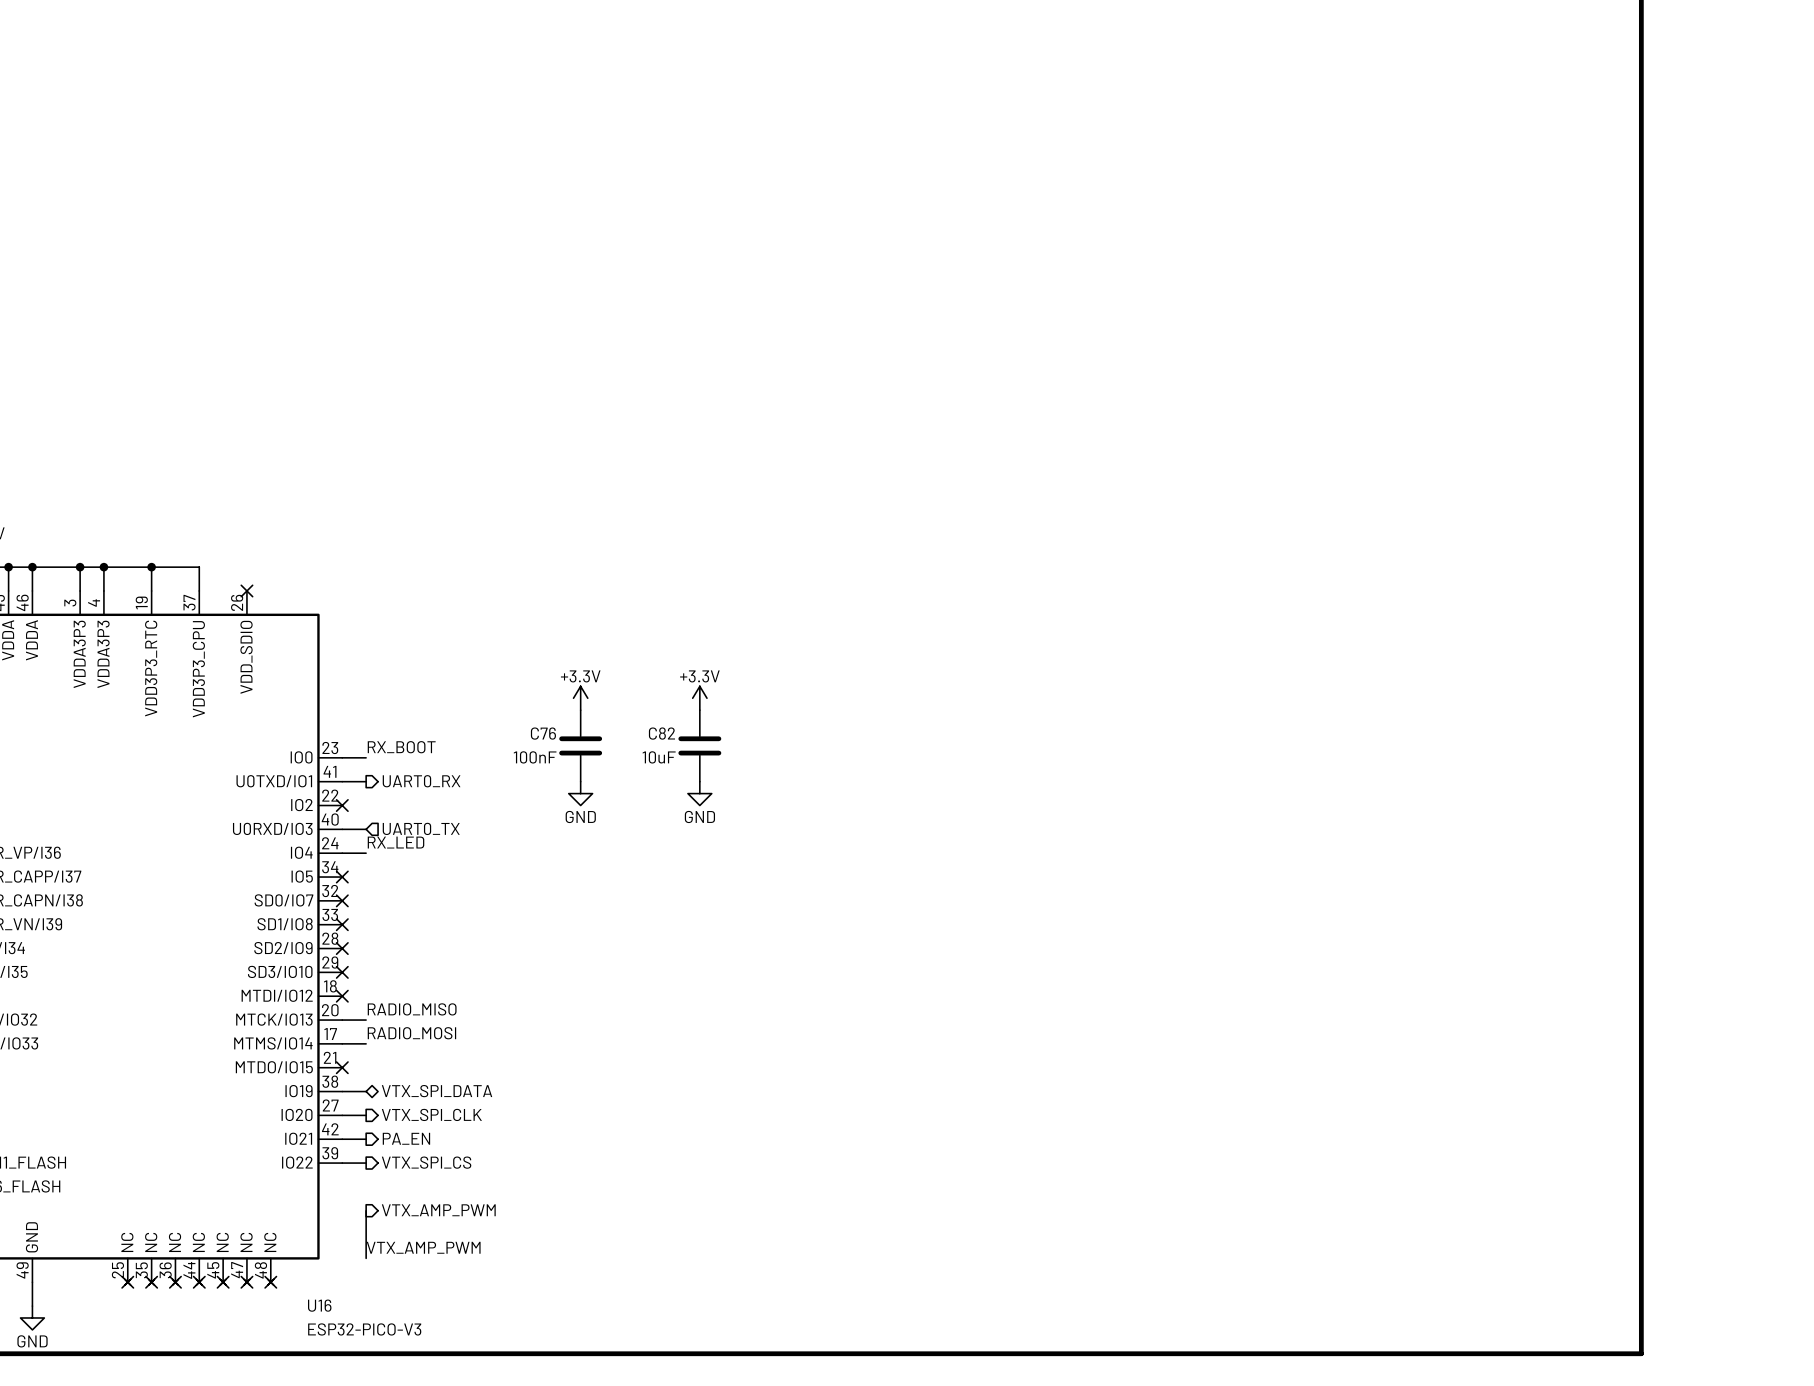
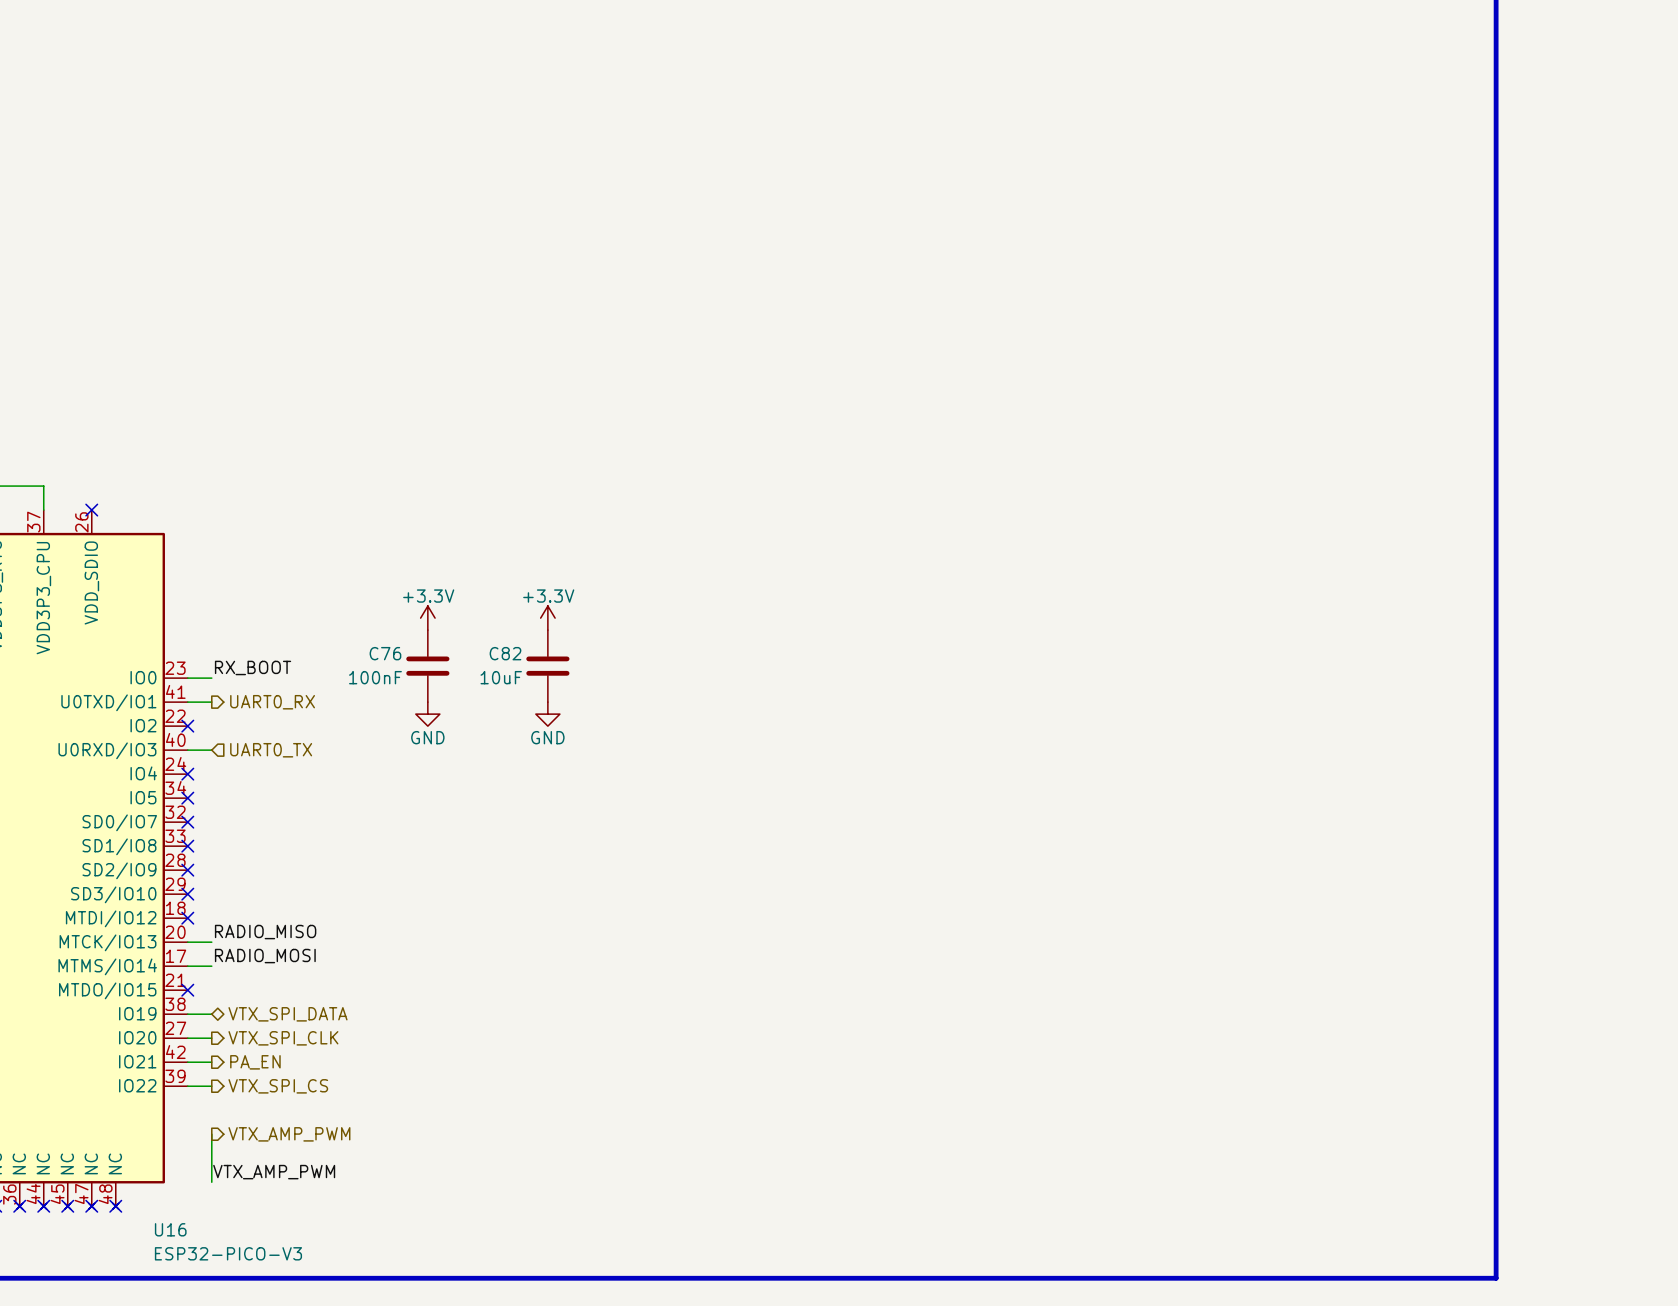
label: RX_LED (396, 842) -> none
wire: (342, 853) (366, 853) -> none
no-connect mark: none -> (187, 774)

